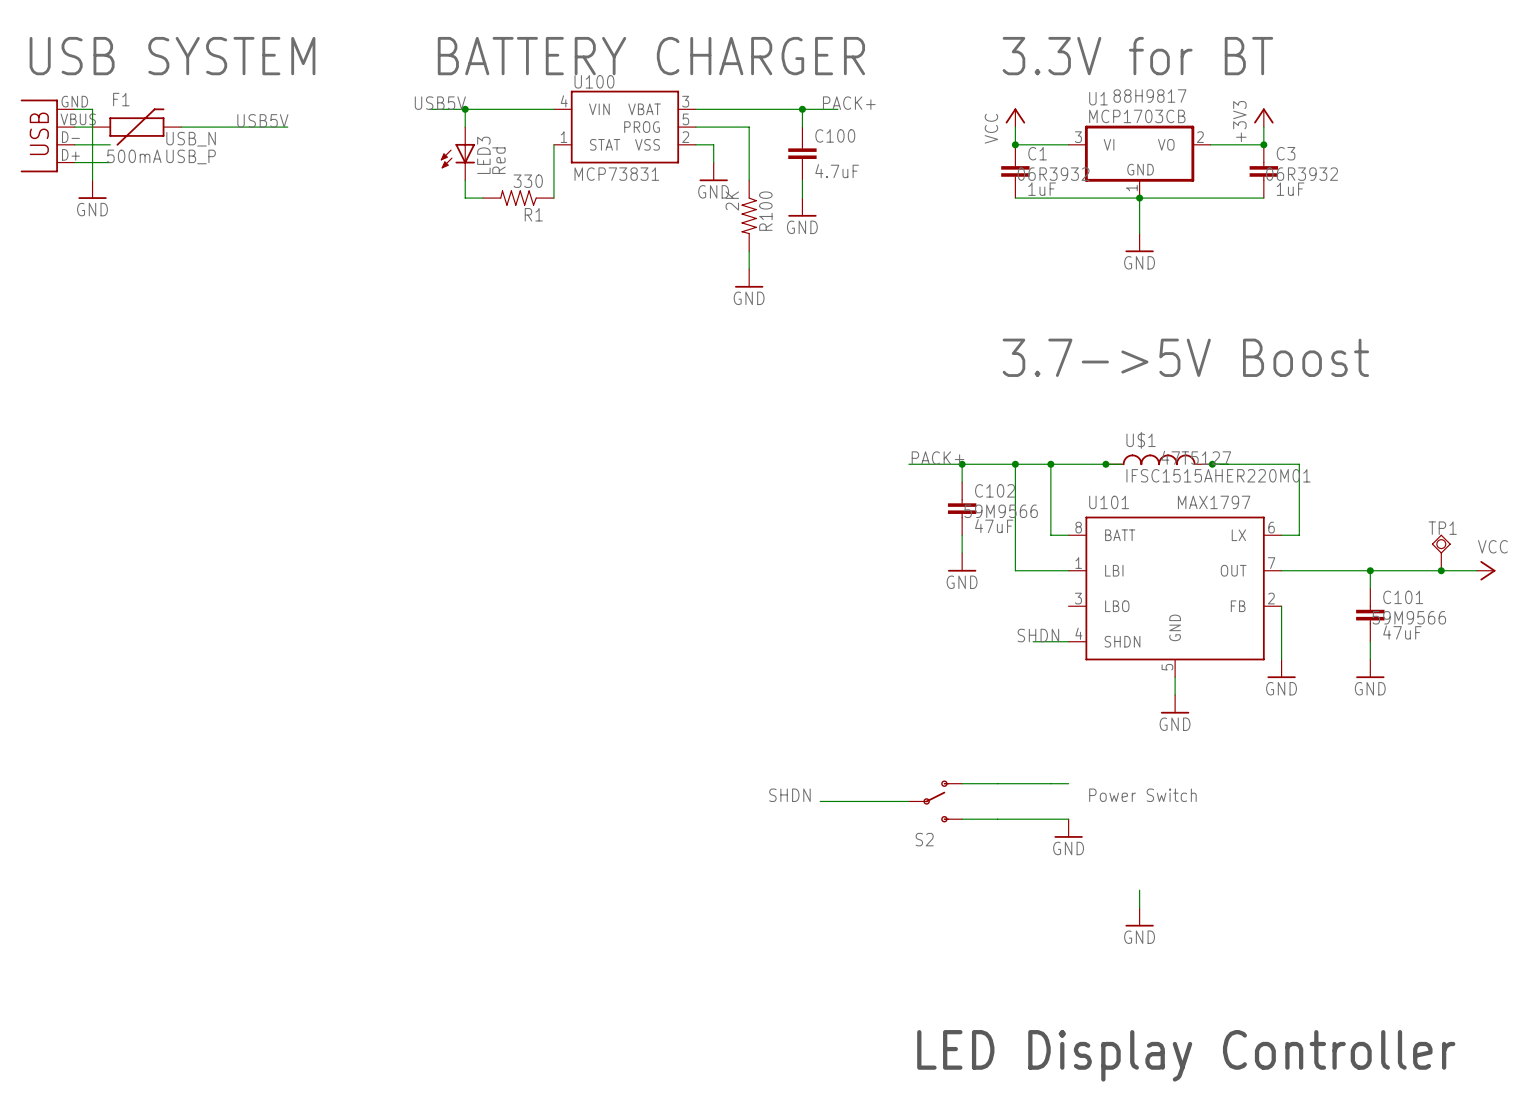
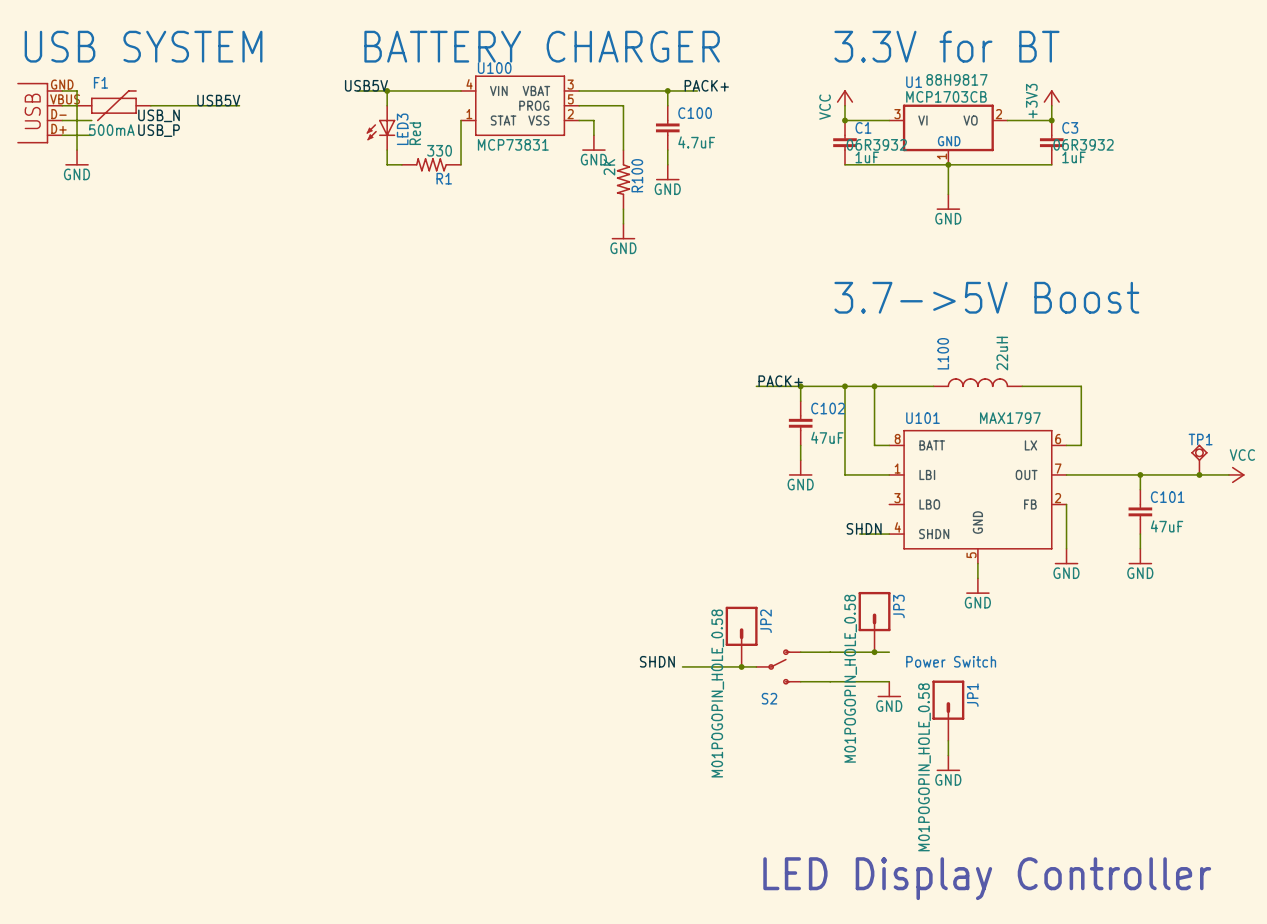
U$1: IFSC1515AHER220M01 (1159, 459) -> none
L100: none -> 22uH (977, 382)
junction: (1105, 464) -> none
junction: (1212, 464) -> none
C102 text: 59M9566 (1001, 511) -> none
C101 text: 59M9566 (1409, 617) -> none
JP3: none -> M01POGOPIN_HOLE_0.58 (874, 622)
JP2: none -> M01POGOPIN_HOLE_0.58 (741, 636)
junction: none -> (874, 652)
junction: none -> (741, 666)
JP1: none -> M01POGOPIN_HOLE_0.58 (948, 710)

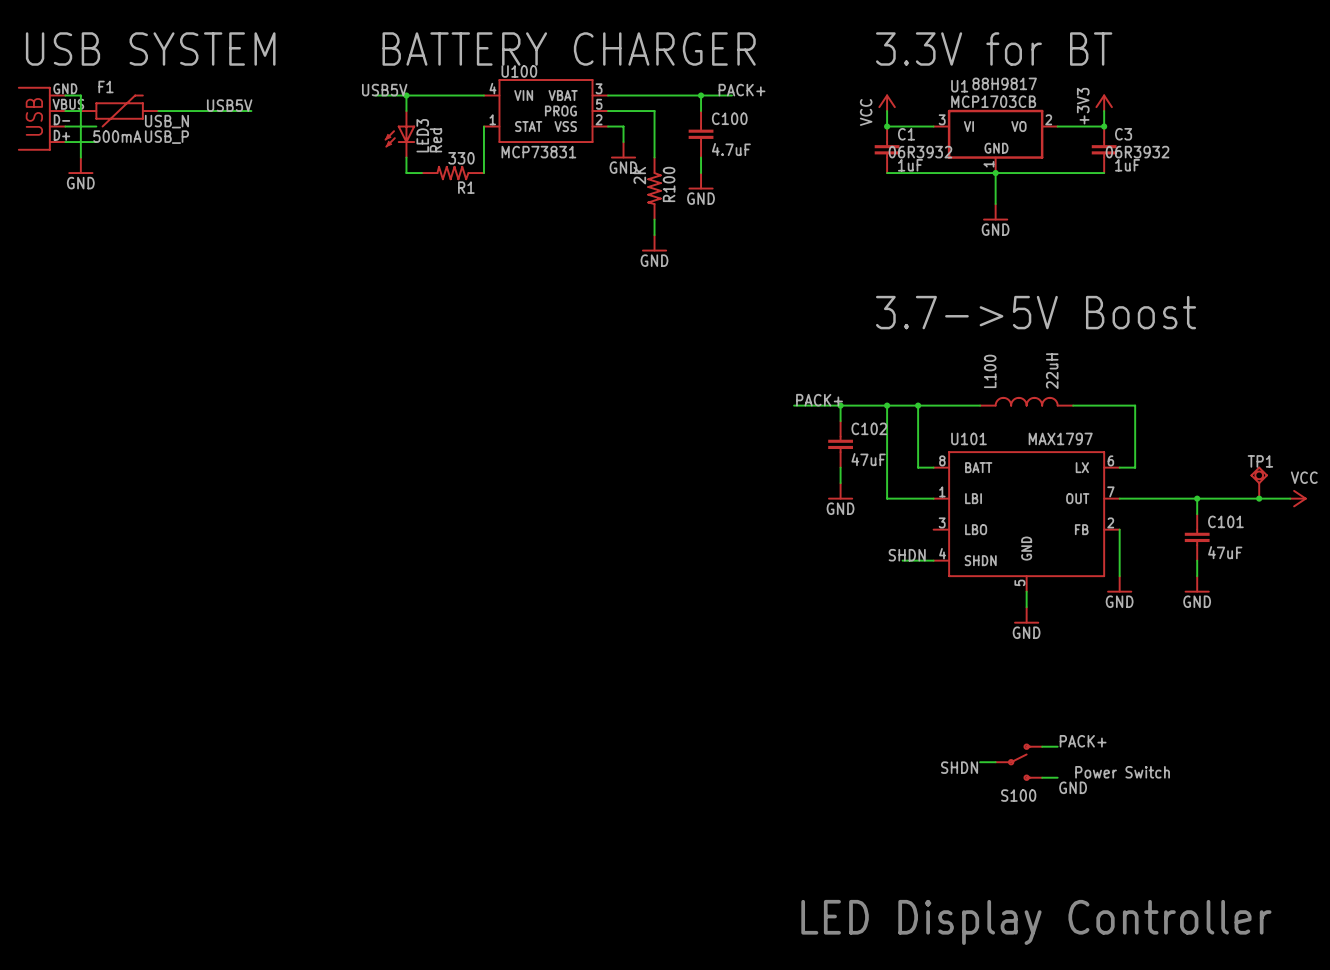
JP3: M01POGOPIN_HOLE_0.58 (874, 622) -> none
JP2: M01POGOPIN_HOLE_0.58 (741, 636) -> none
wire: (800, 652) (889, 652) -> none
junction: (874, 652) -> none
label: SHDN (657, 661) -> none
text position: Power Switch (951, 661) -> Power Switch (1122, 772)
wire: (682, 666) (756, 666) -> none
junction: (741, 666) -> none
S2: (778, 666) -> none
wire: (800, 681) (889, 681) -> none
power symbol: GND (889, 689) -> none
label: none -> PACK+ (1083, 741)
JP1: M01POGOPIN_HOLE_0.58 (948, 710) -> none
wire: none -> (1042, 746) (1057, 746)
wire: none -> (980, 762) (995, 762)
S100: none -> (1018, 762)
label: none -> SHDN (959, 767)
wire: (948, 740) (948, 755) -> none
wire: none -> (1042, 777) (1057, 777)
label: none -> GND (1073, 787)
power symbol: GND (948, 763) -> none

